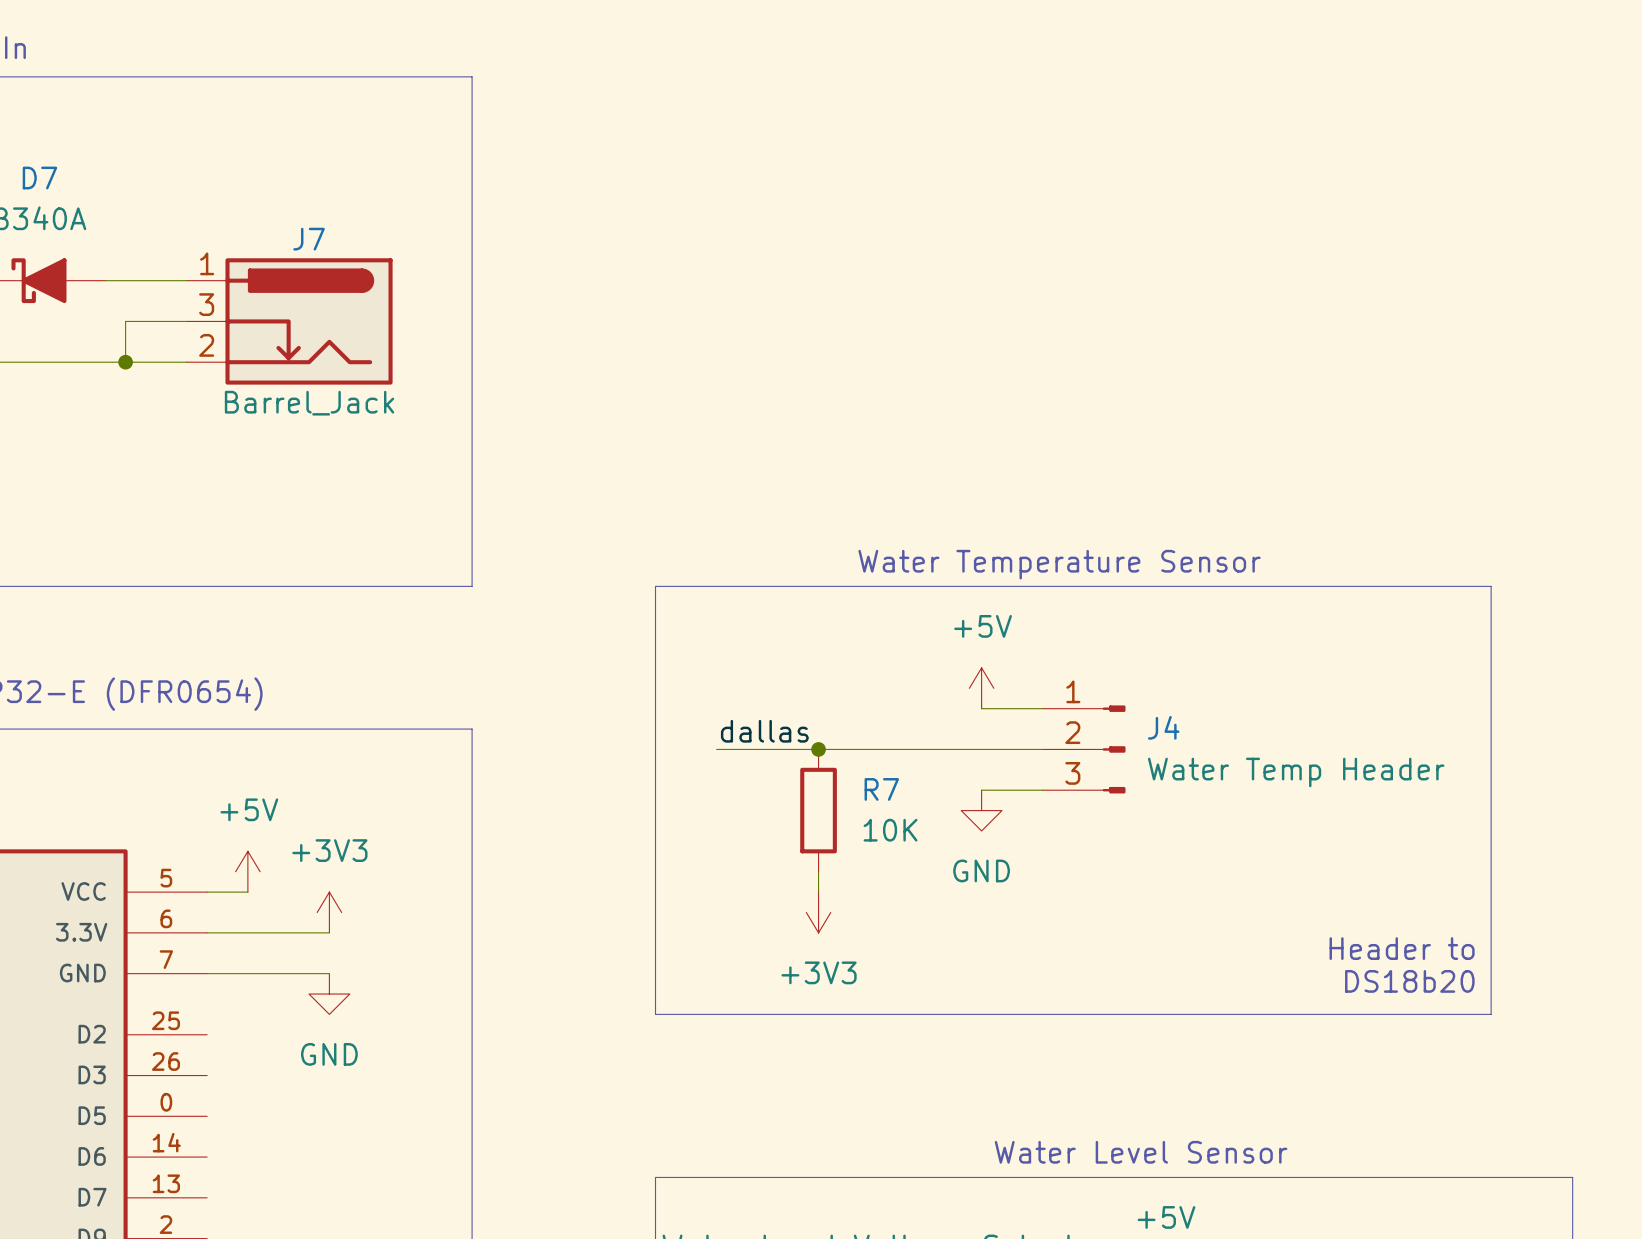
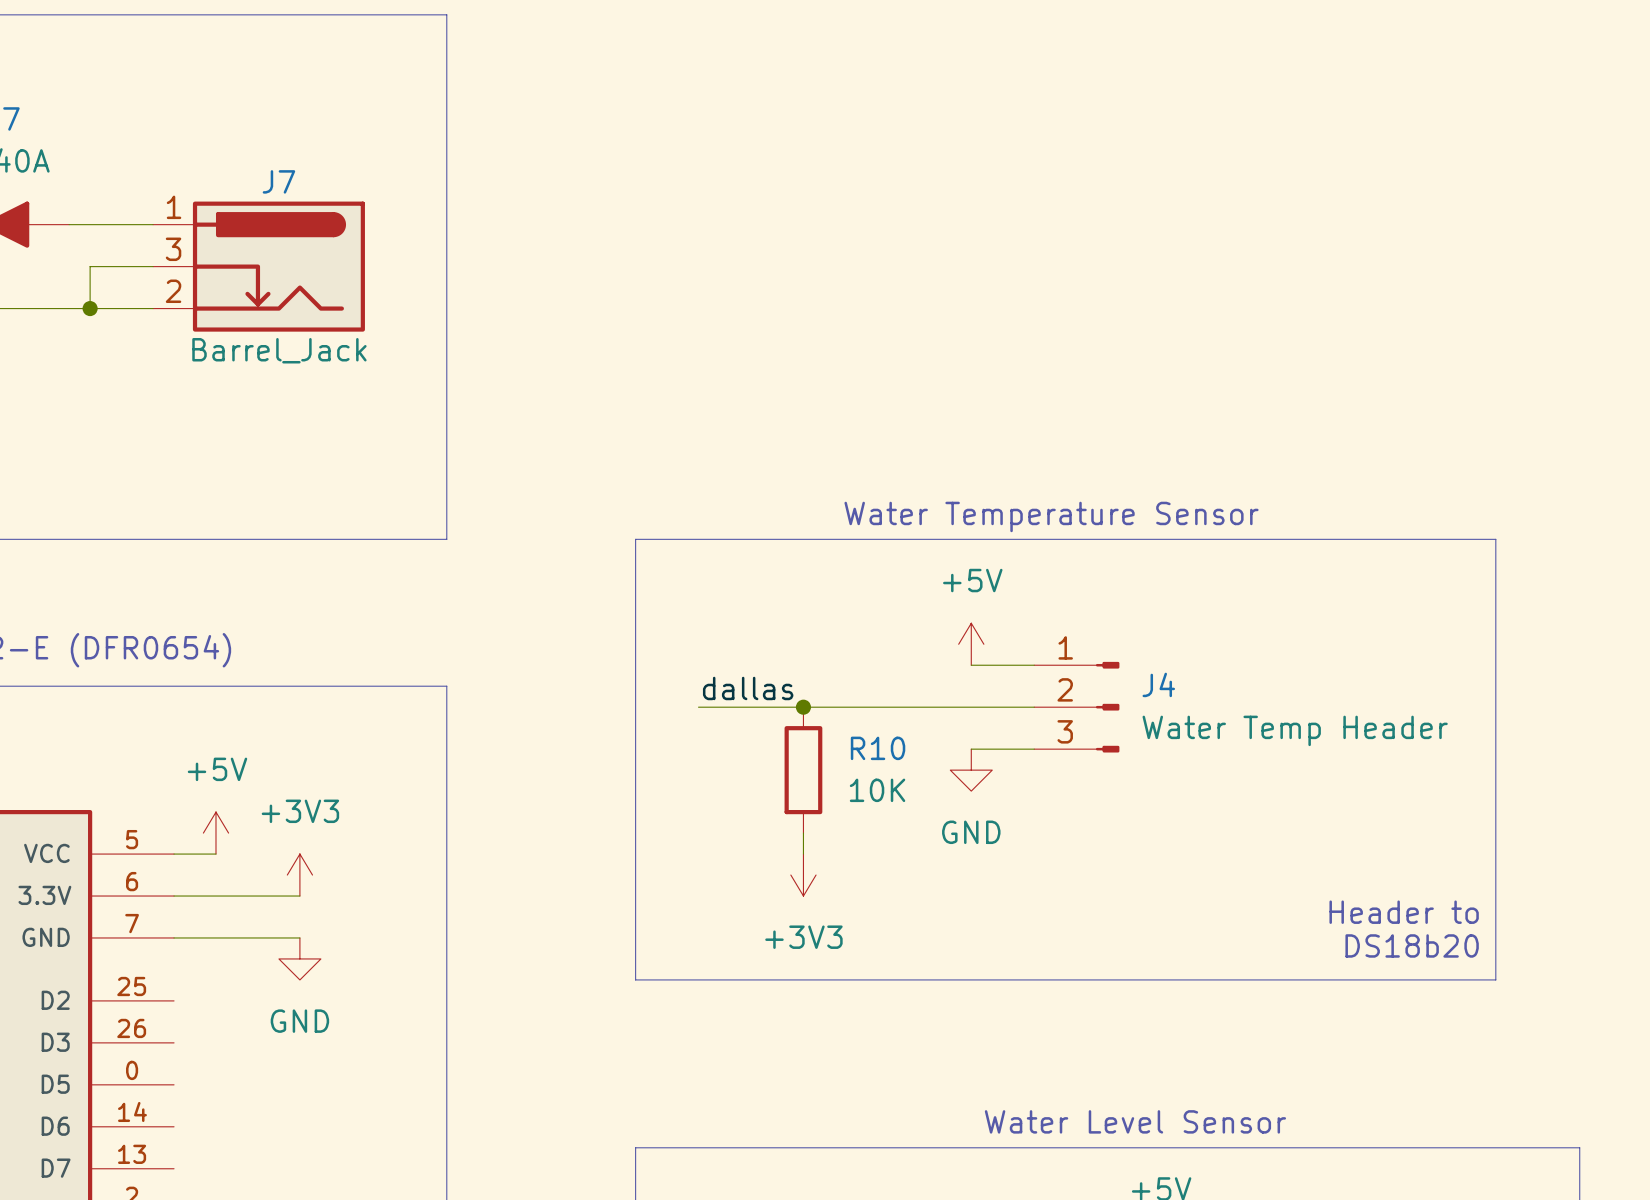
R7 name: R7 (881, 789) -> R10 (878, 748)

